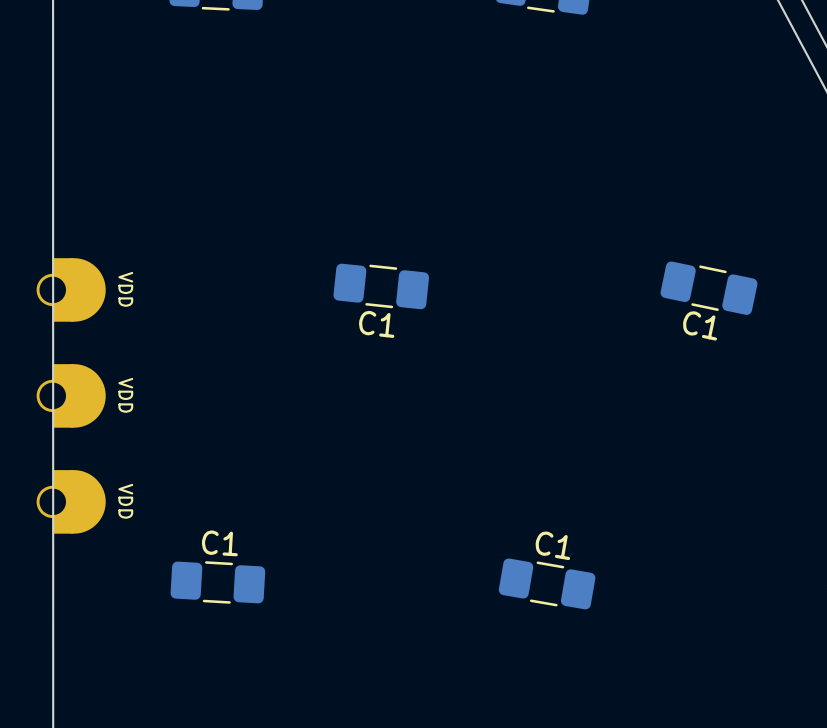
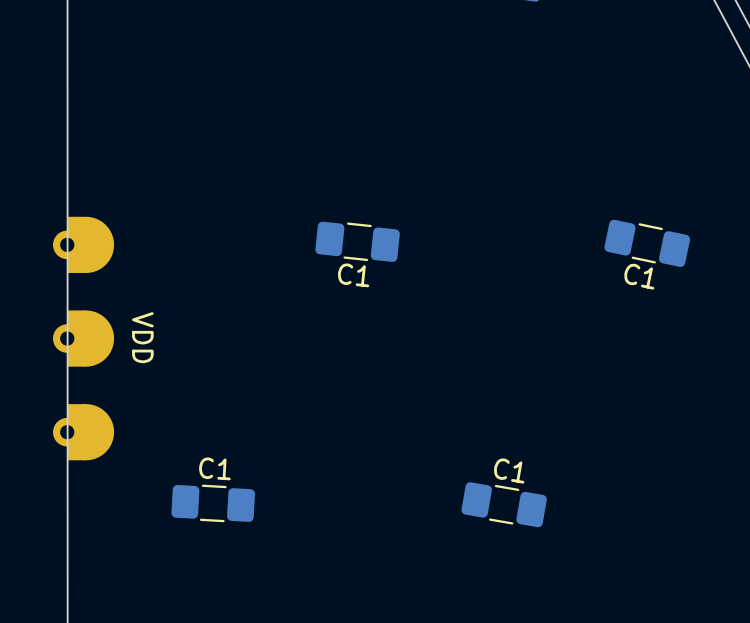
text: VDD (125, 289) -> none
part: (71, 395) -> none
VDD: none -> (83, 338)
text: VDD (125, 395) -> none
text: VDD (125, 501) -> none

